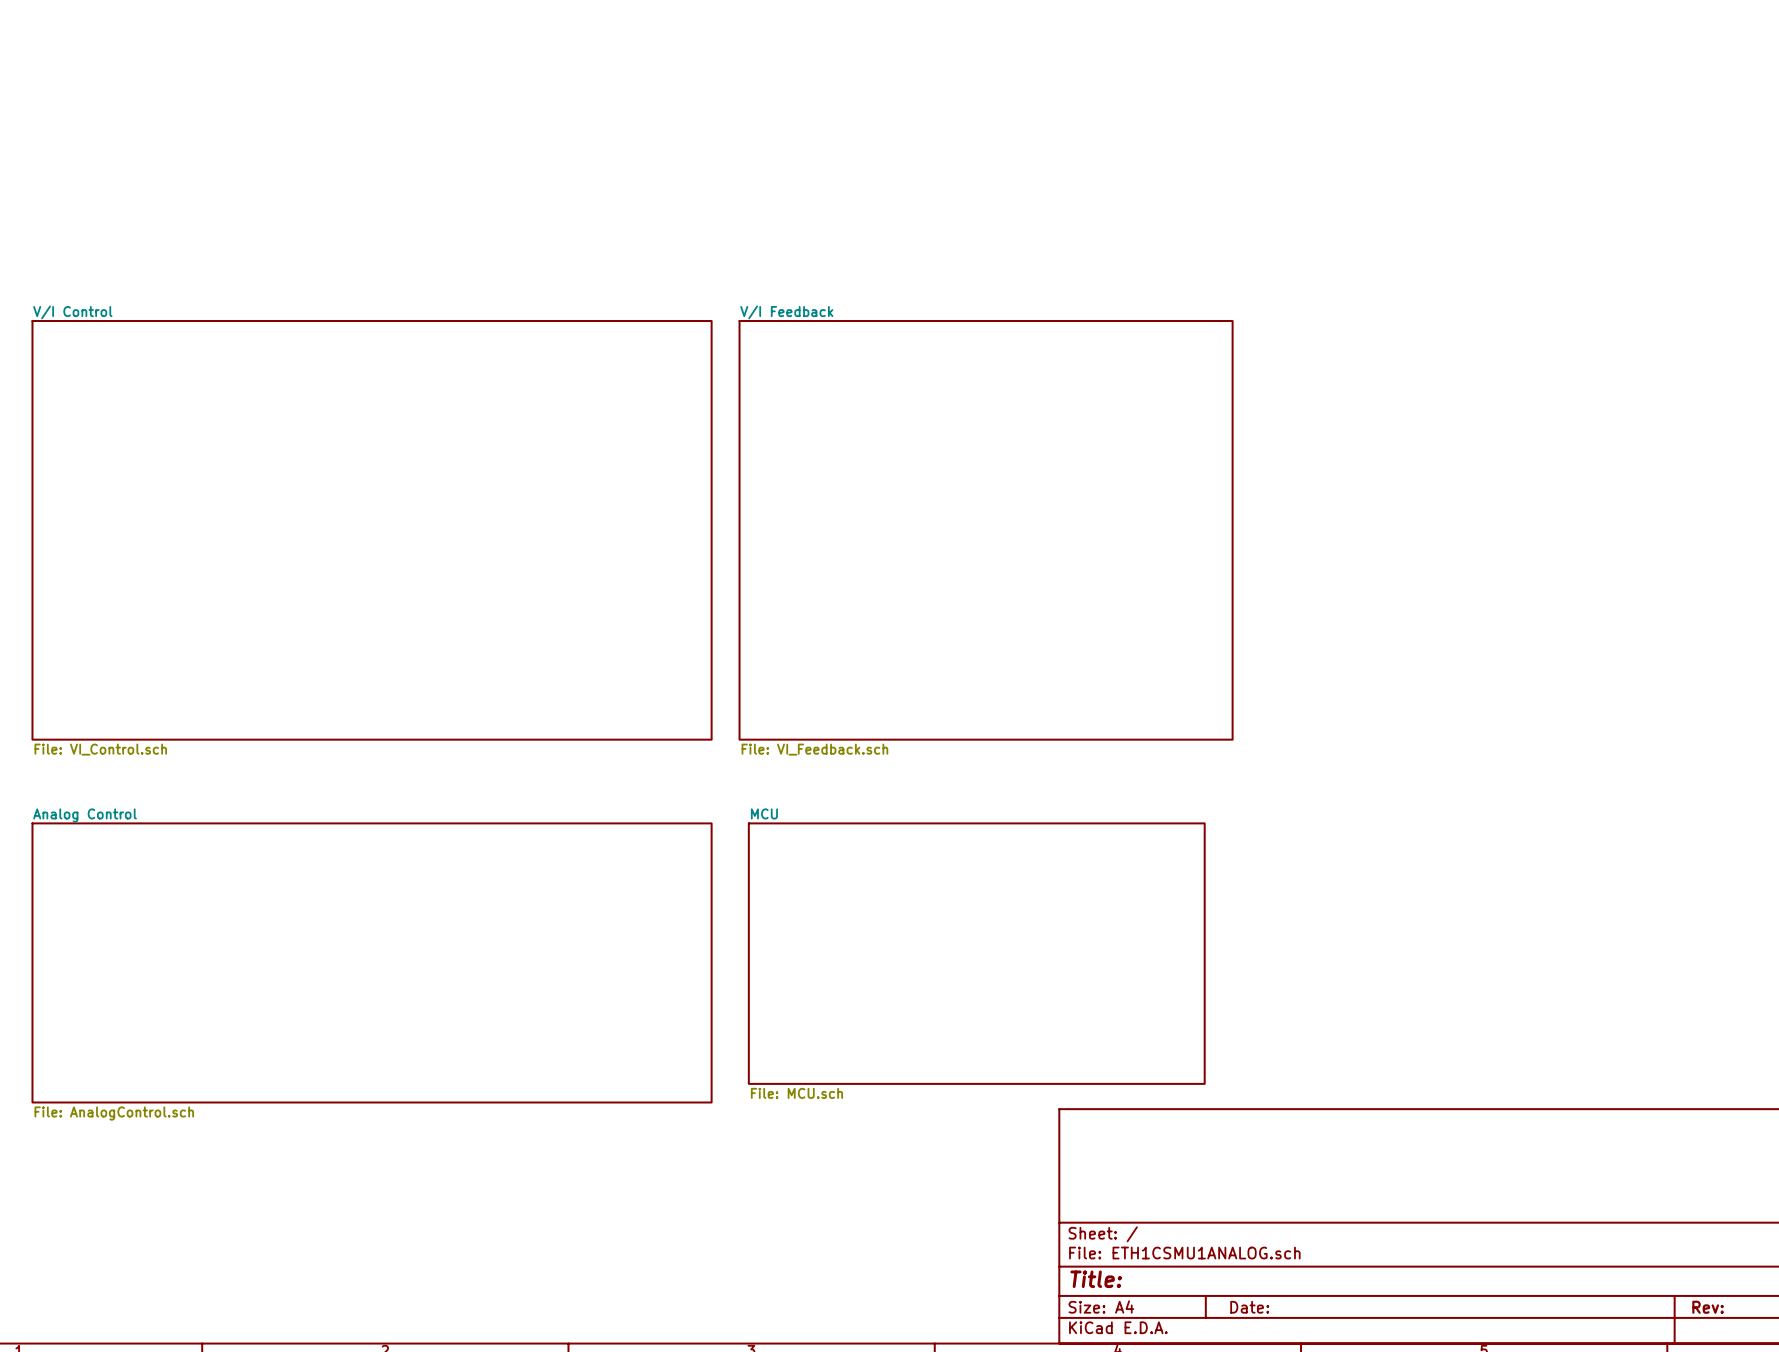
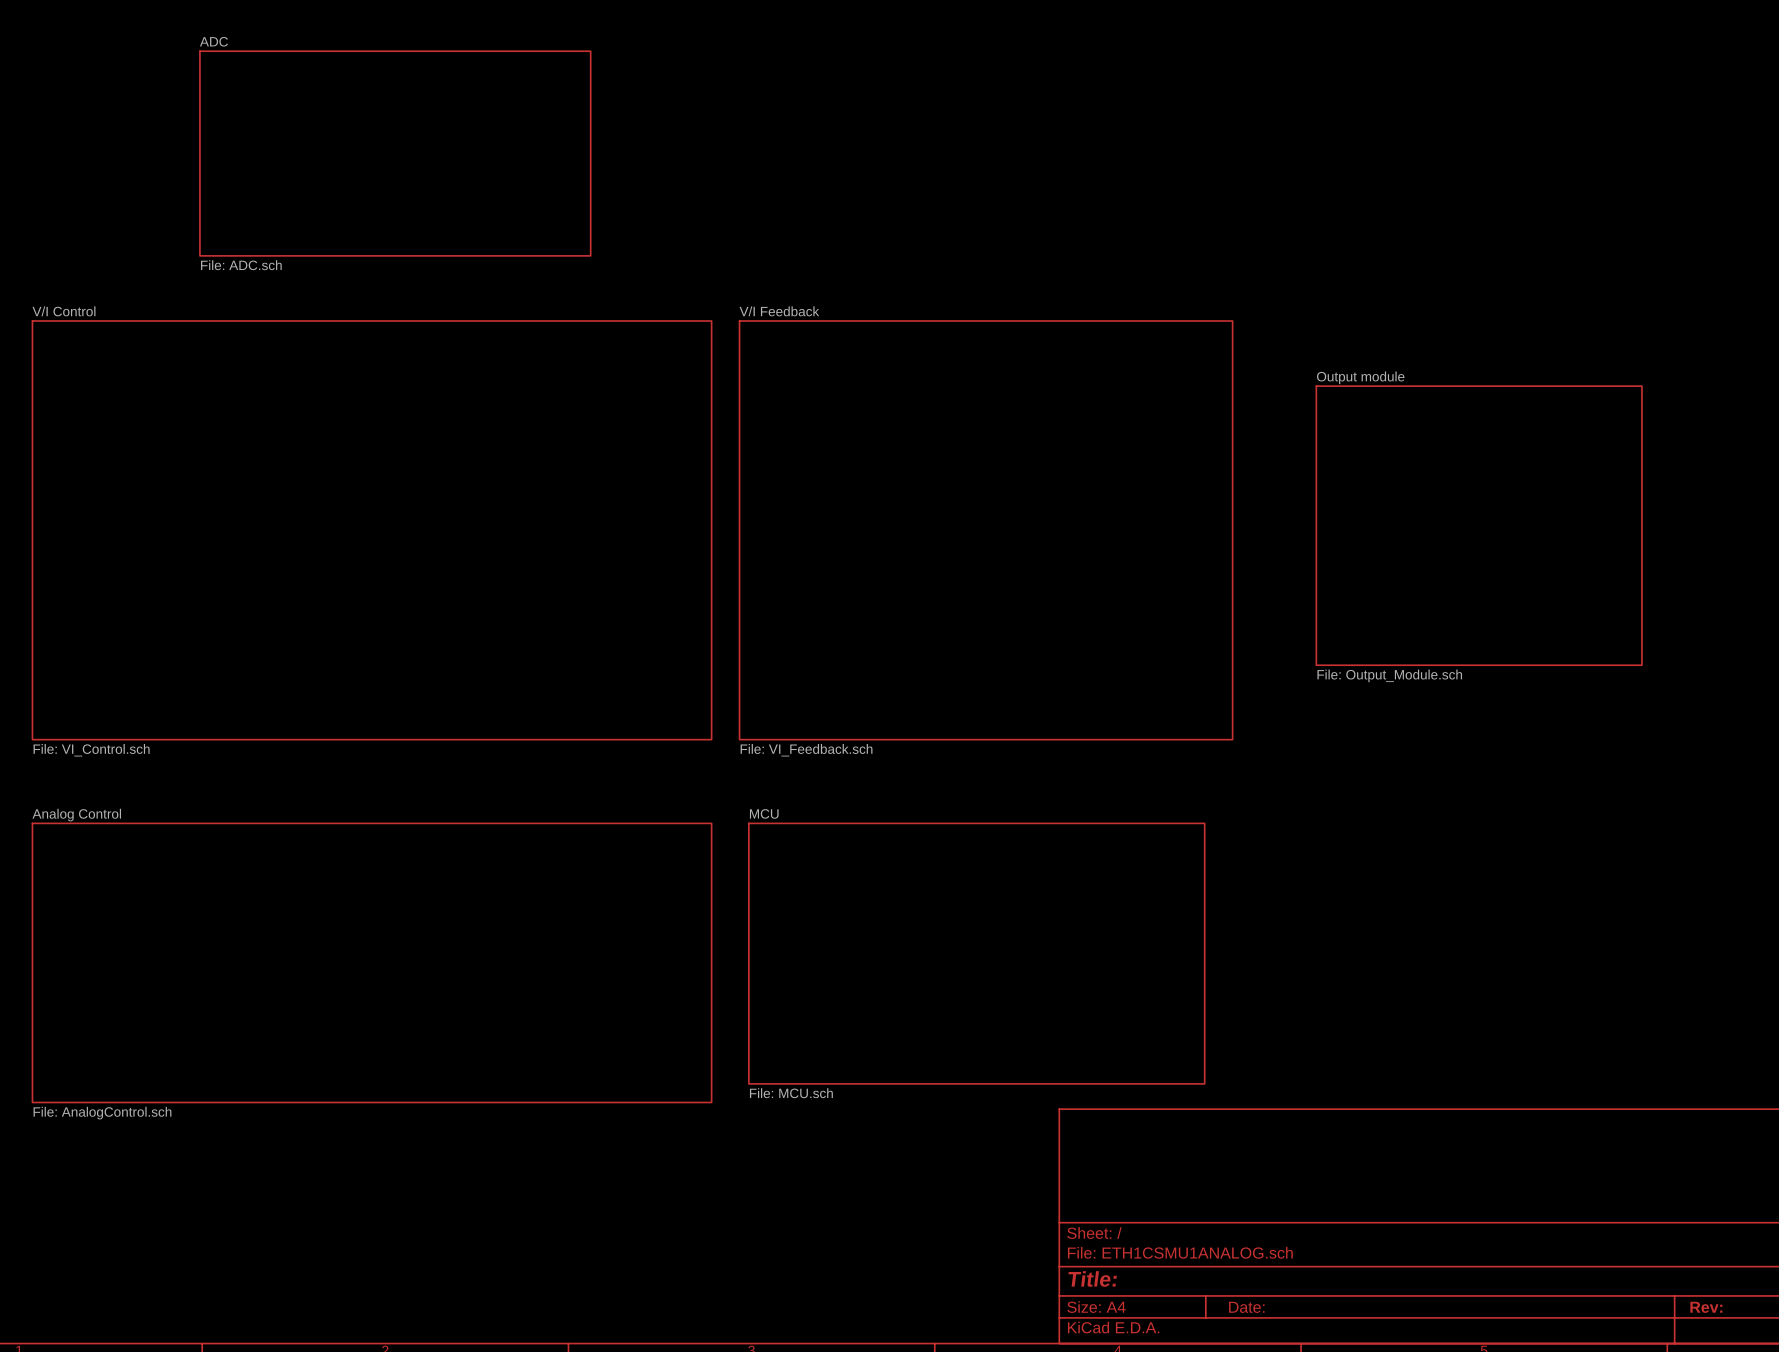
sheet ADC: none -> File: ADC.sch (395, 153)
sheet Output module: none -> File: Output_Module.sch (1479, 525)

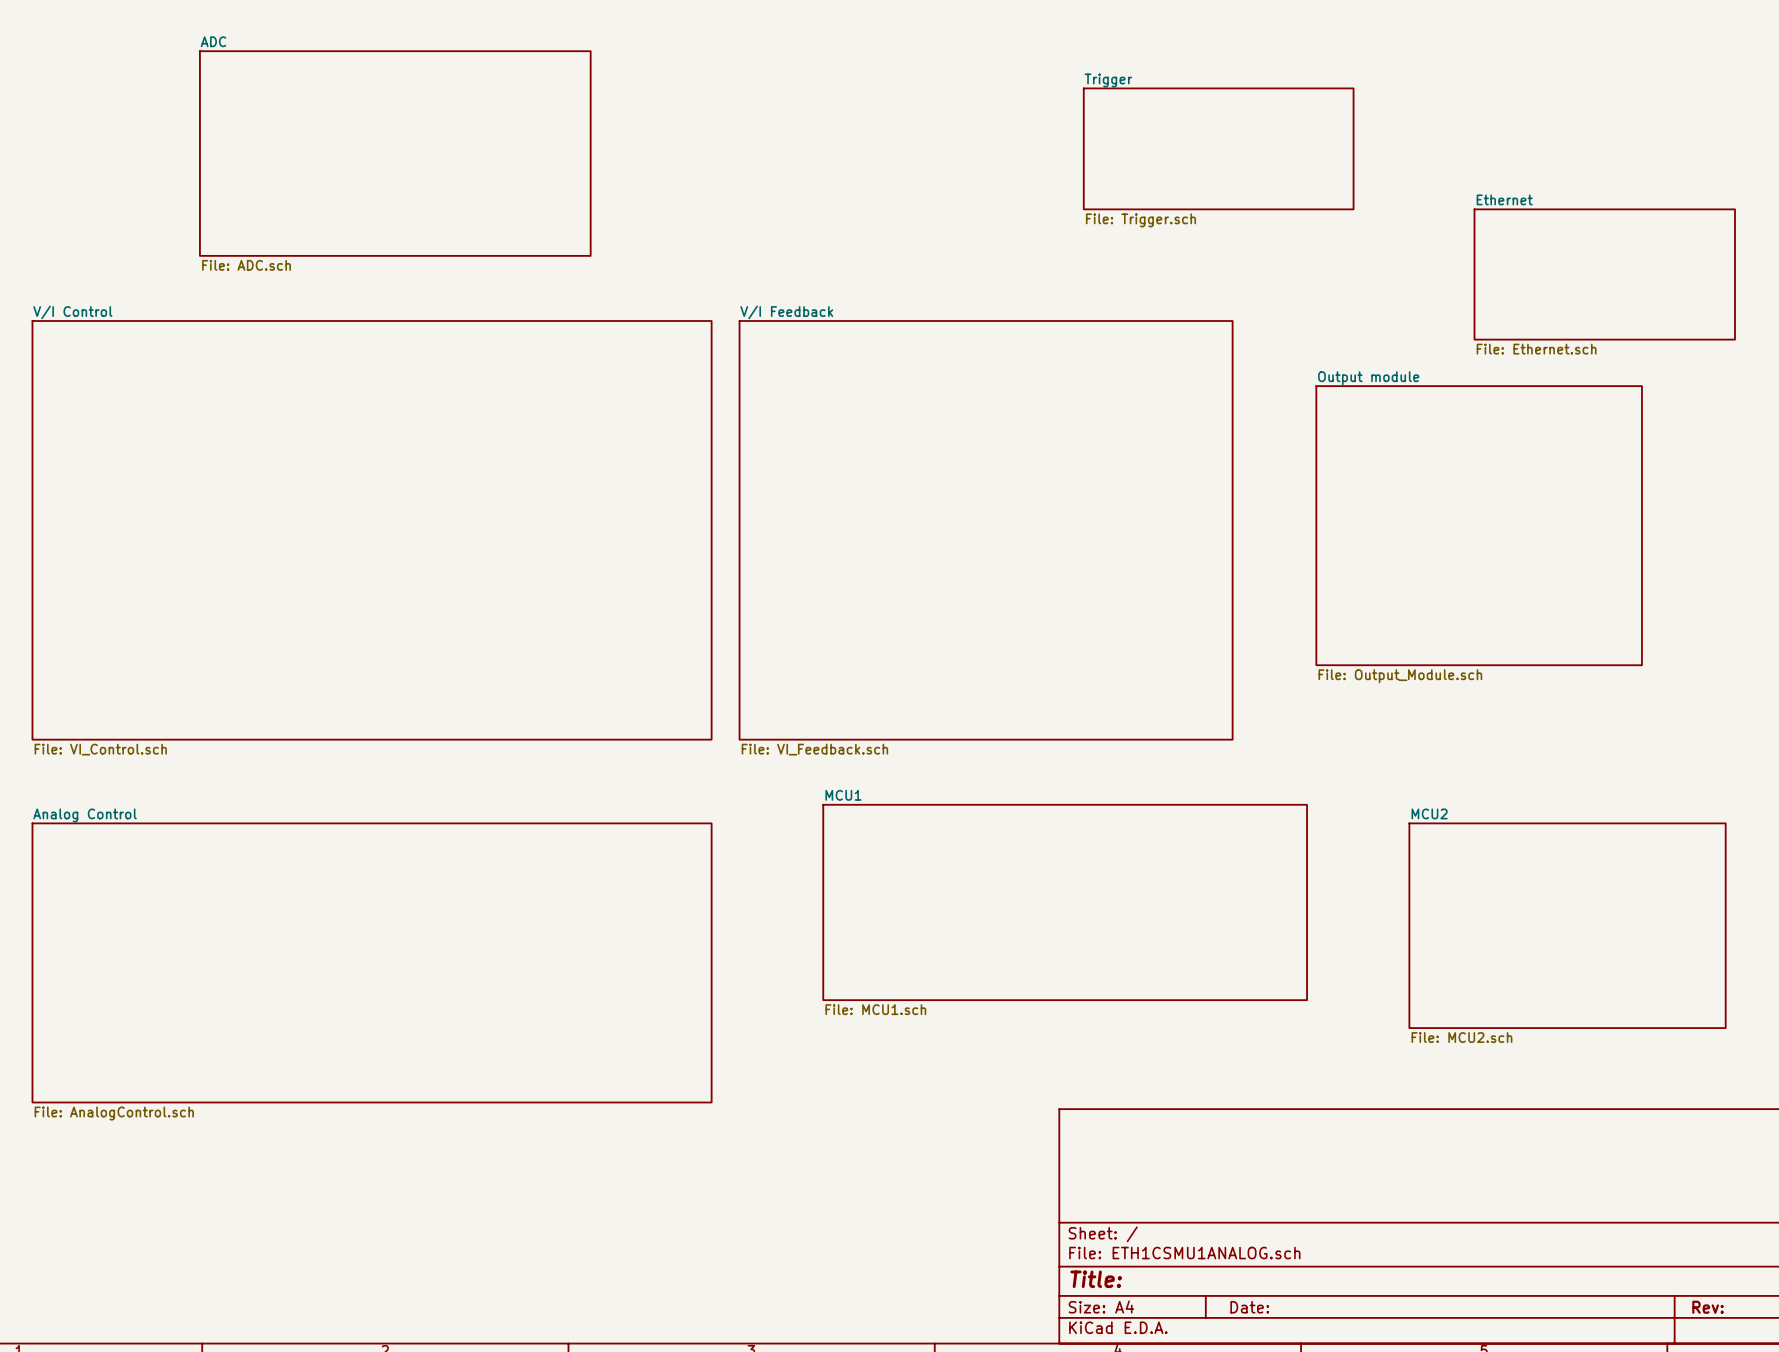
sheet Trigger: none -> File: Trigger.sch (1218, 148)
sheet Ethernet: none -> File: Ethernet.sch (1604, 274)
sheet MCU1: none -> File: MCU1.sch (1065, 902)
sheet MCU2: none -> File: MCU2.sch (1567, 925)
sheet MCU: File: MCU.sch (976, 953) -> none

